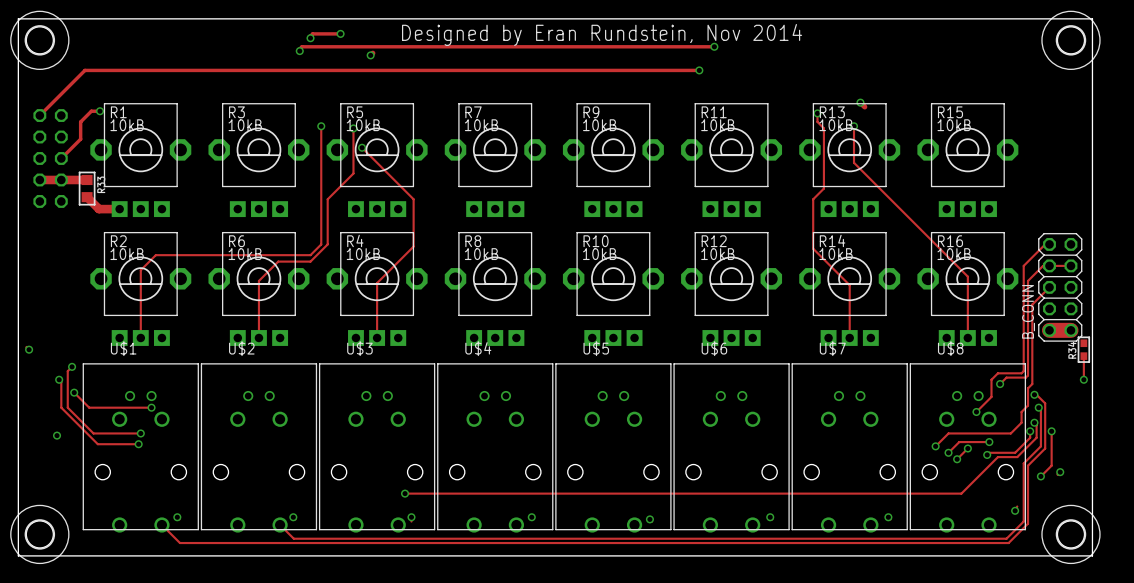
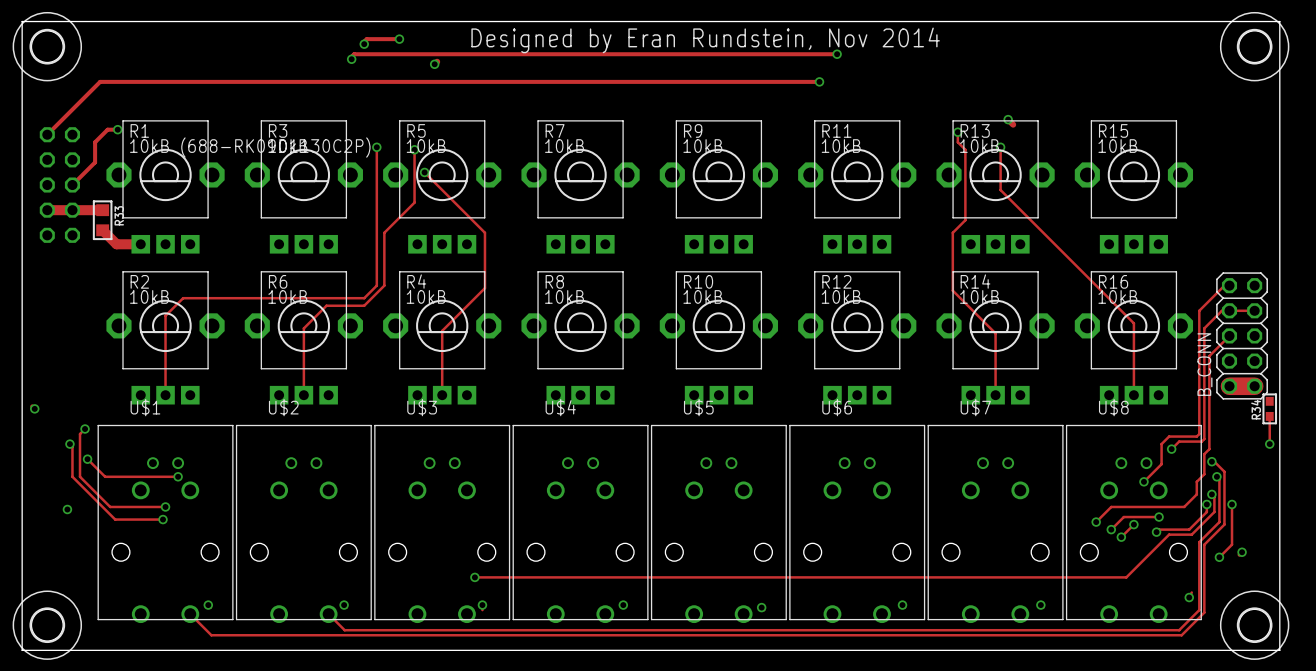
R1 value: 10kB (127, 125) -> 10kB (688-RK09D1130C2P) (250, 147)

